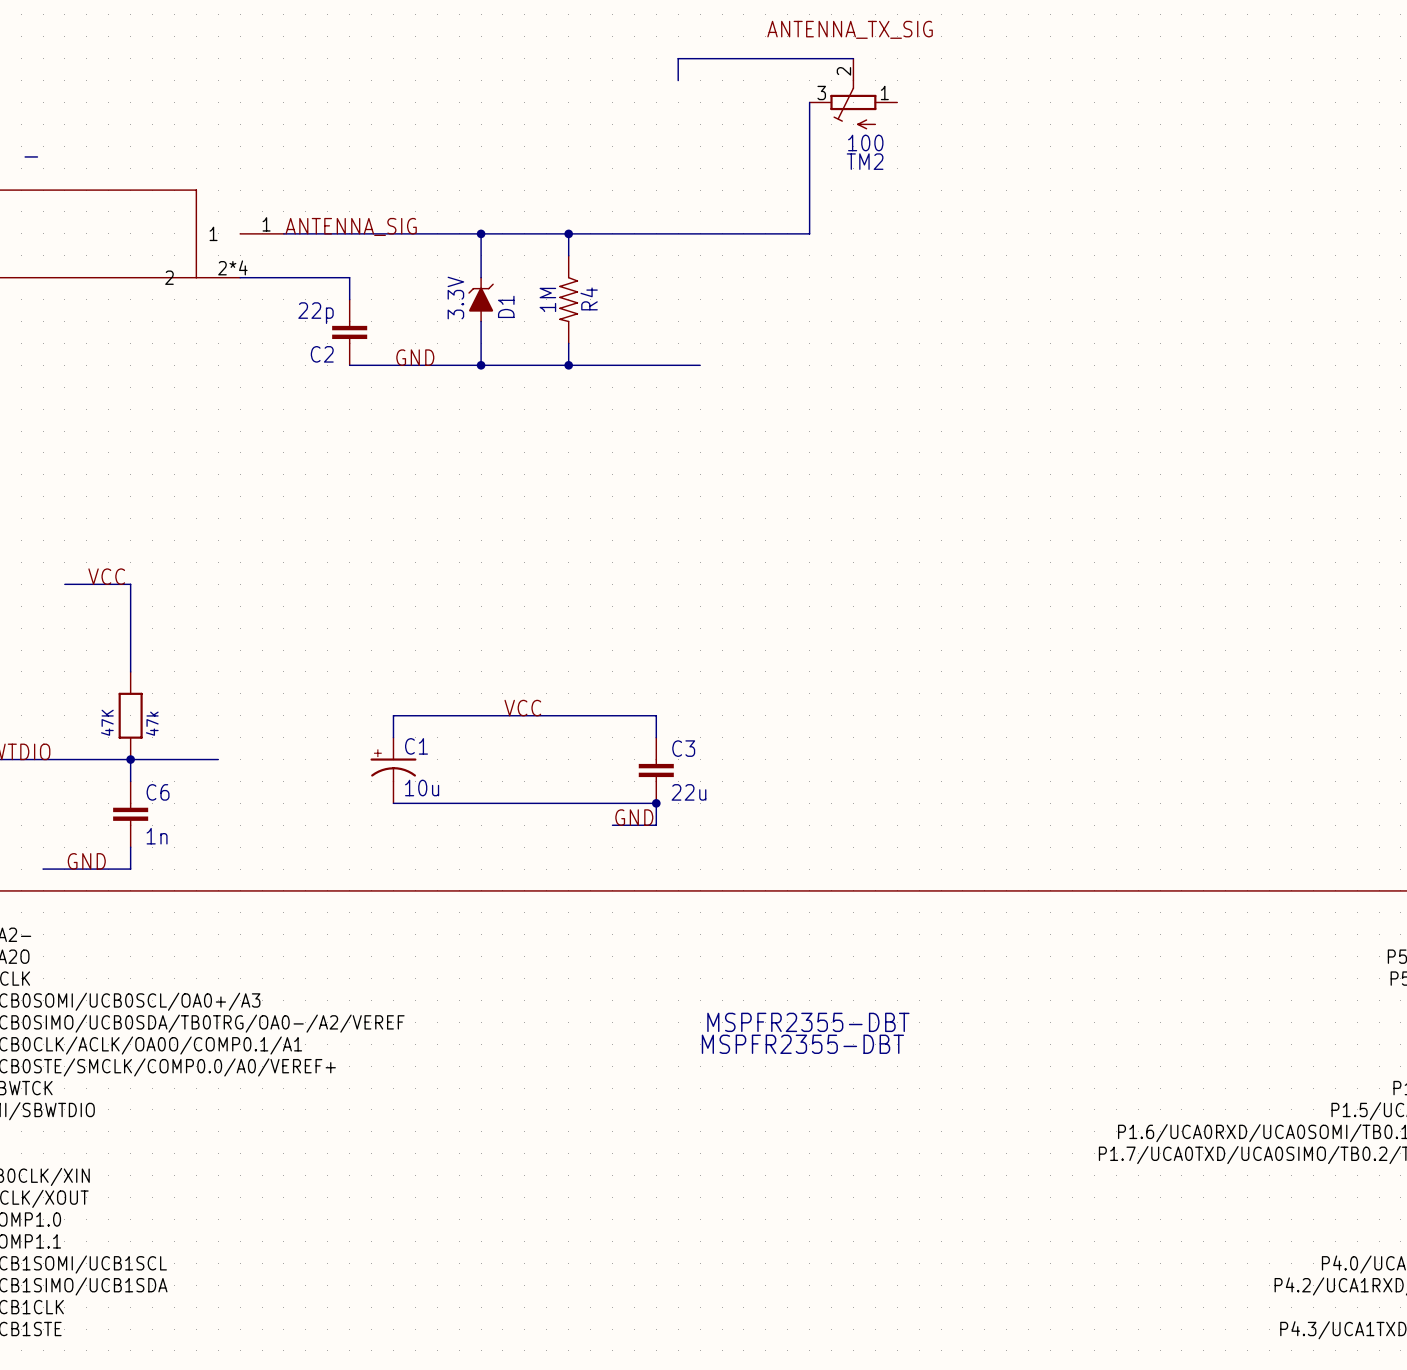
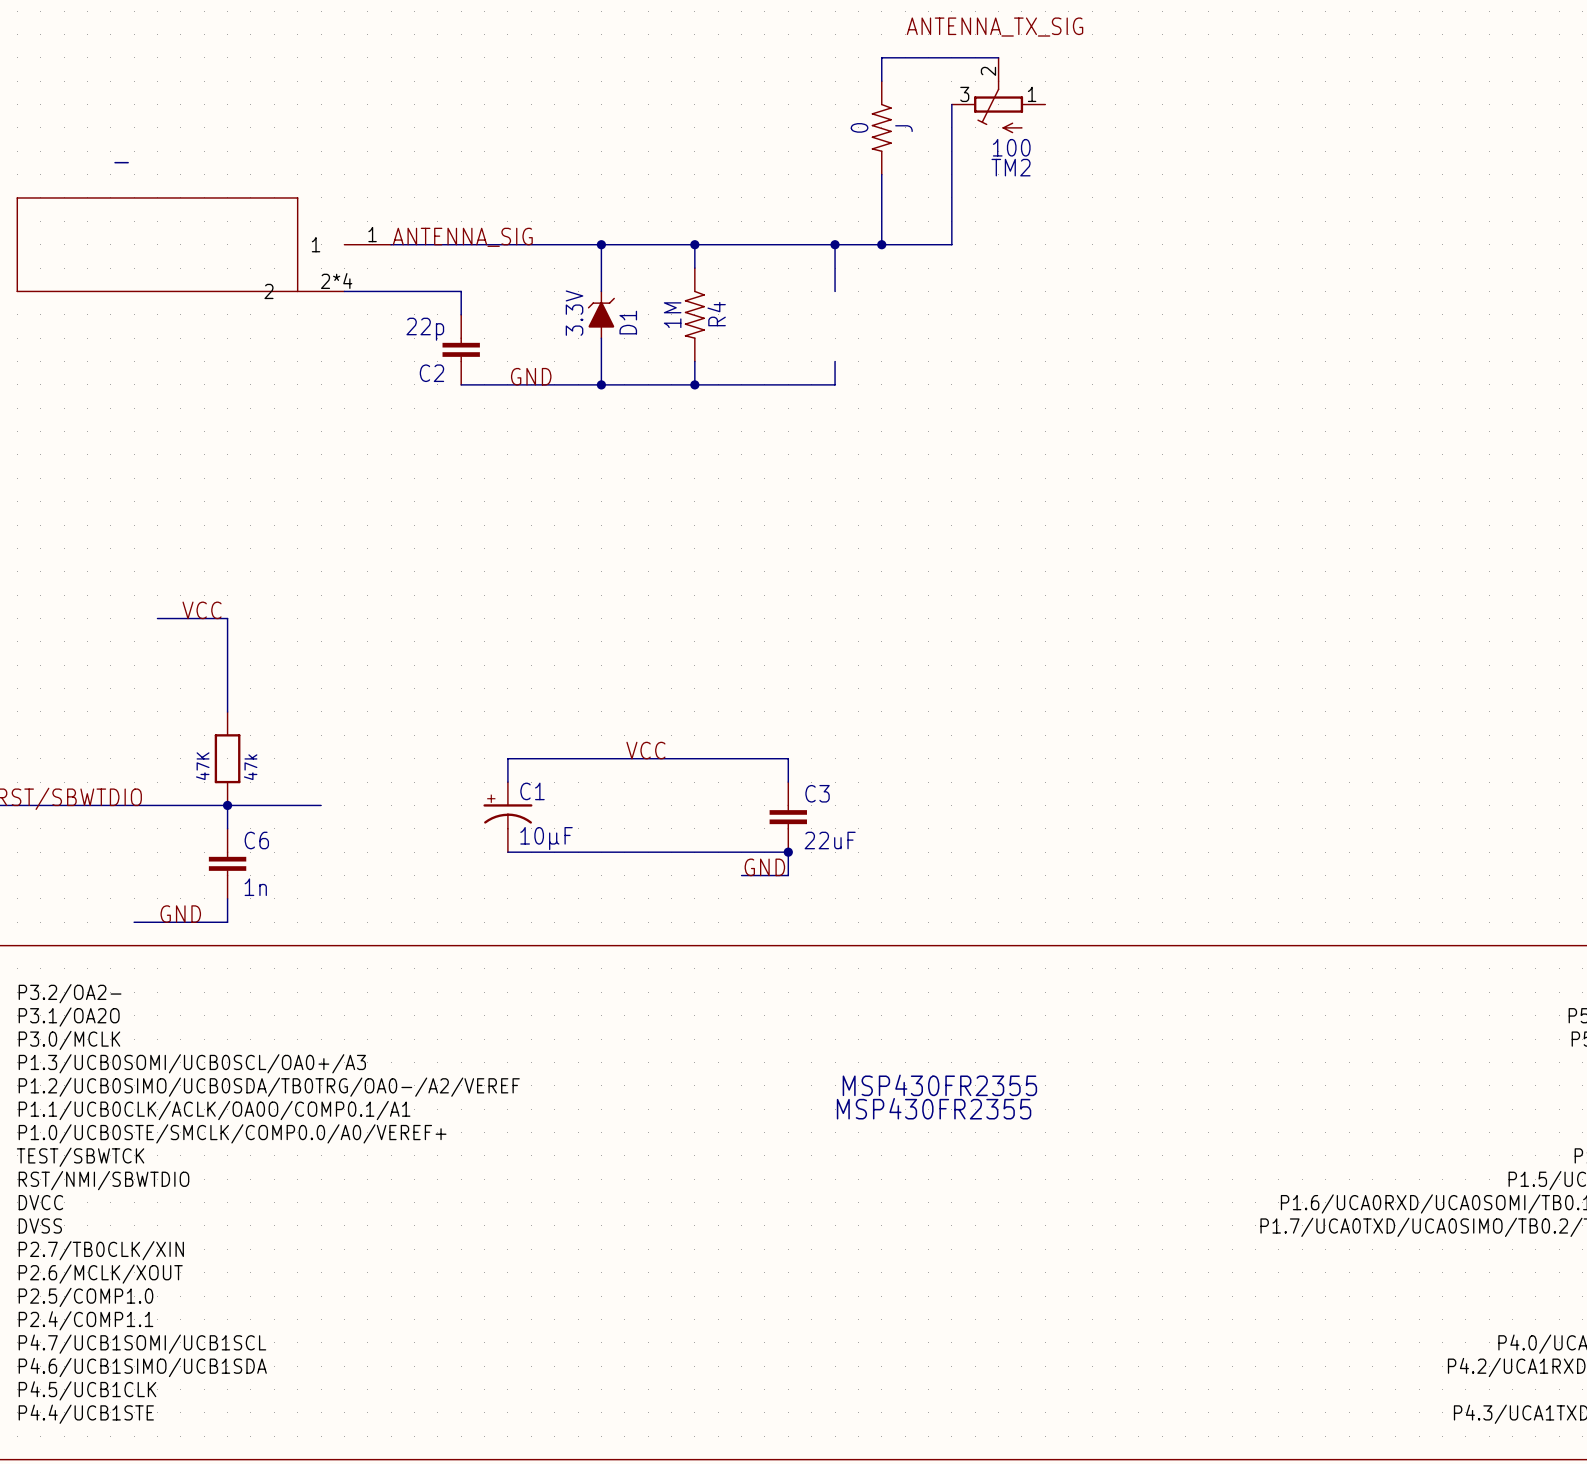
wire: (743, 58) (678, 58) (678, 80) -> (881, 57) (881, 81)
J: none -> 0 (881, 127)
wire: none -> (881, 174) (881, 244)
wire: none -> (835, 244) (835, 291)
junction: none -> (835, 244)
junction: none -> (881, 244)
wire: none -> (835, 361) (835, 384)
C1 value: 10u (422, 788) -> 10µF (546, 838)
C3 value: 22u (688, 792) -> 22uF (830, 840)
MSPFR2355-DBT name: MSPFR2355-DBT (808, 1022) -> MSP430FR2355 (939, 1085)
MSPFR2355-DBT value: MSPFR2355-DBT (802, 1044) -> MSP430FR2355 (934, 1108)

